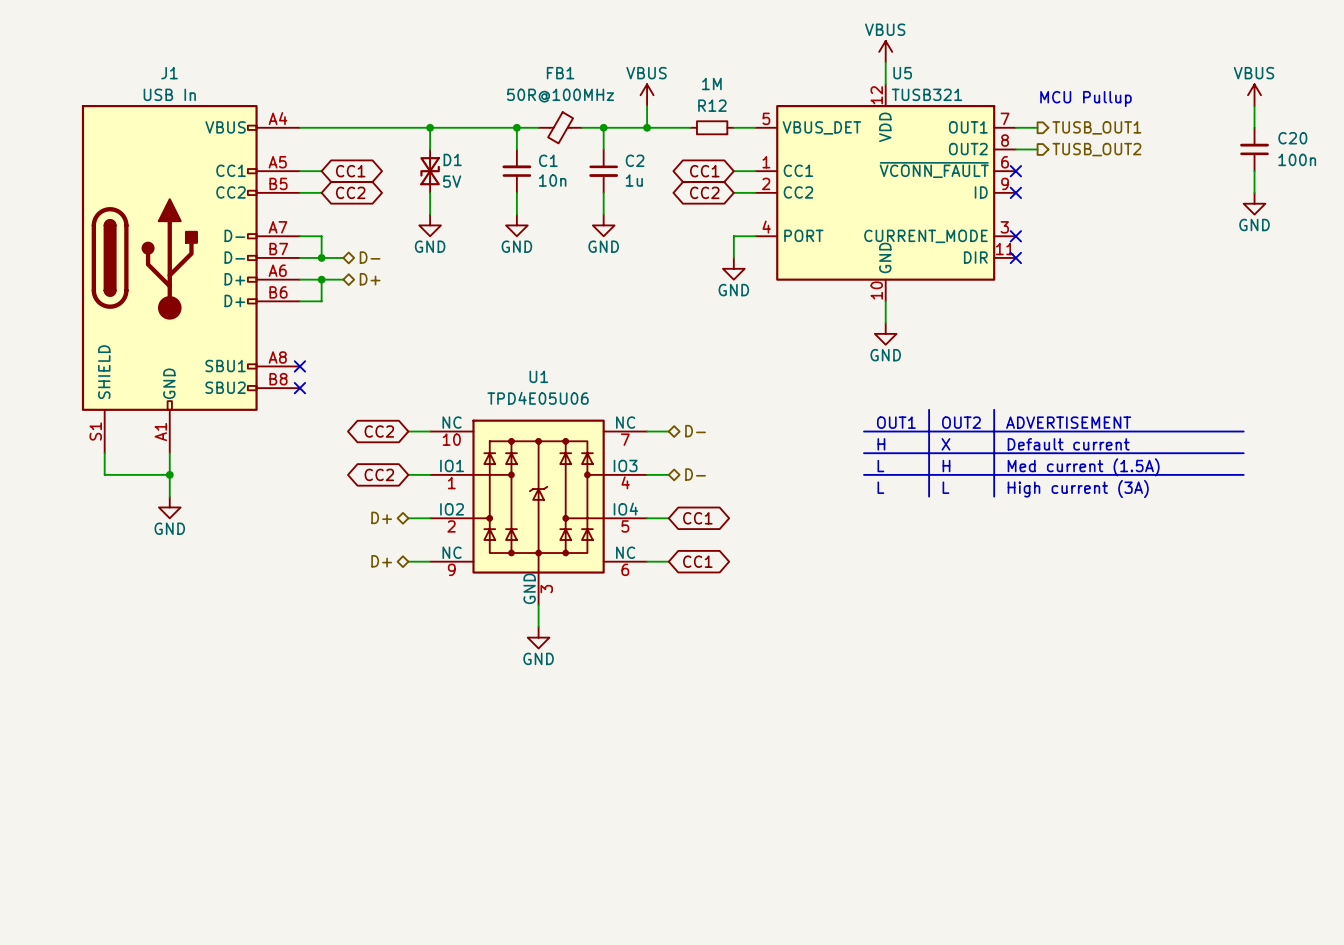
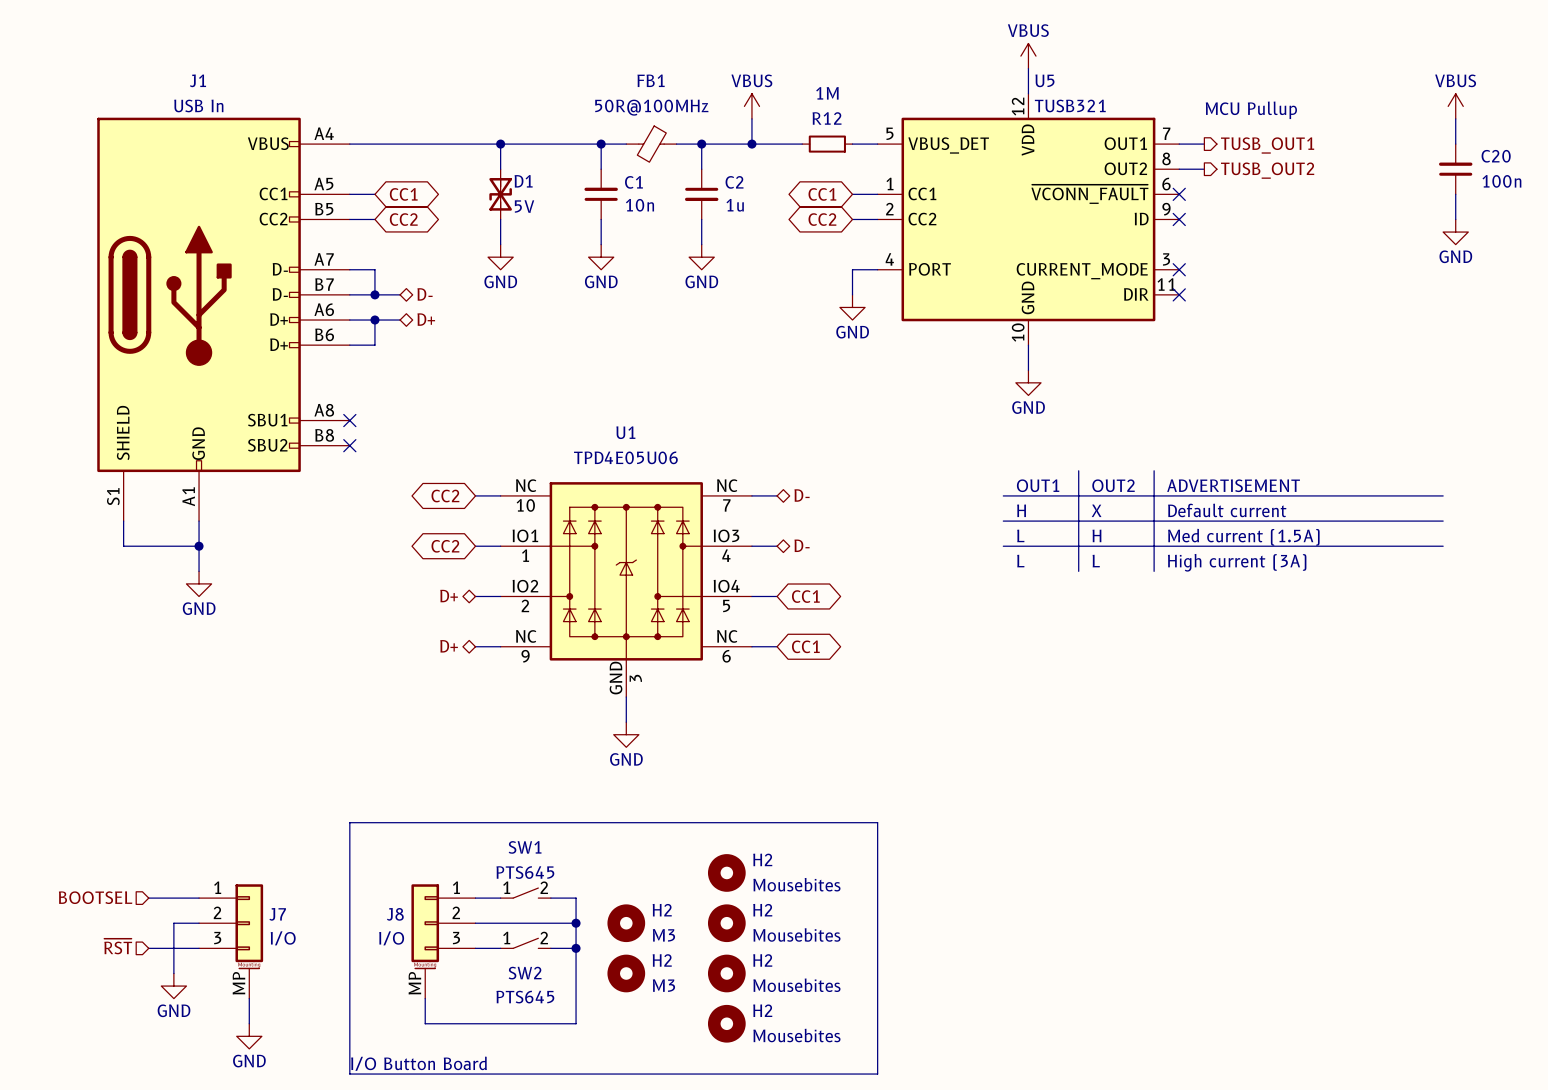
line: none -> (349, 822) (877, 822) (877, 1074) (349, 1074) (349, 822)
H2: none -> Mousebites (726, 872)
SW1: none -> PTS645 (525, 893)
hierarchical label: none -> BOOTSEL (95, 897)
wire: none -> (148, 898) (199, 898)
wire: none -> (475, 898) (500, 898)
wire: none -> (550, 898) (576, 898) (576, 1023) (425, 1023) (425, 998)
wire: none -> (199, 923) (173, 923) (173, 973)
wire: none -> (475, 923) (576, 923)
junction: none -> (576, 923)
H2: none -> M3 (626, 923)
H2: none -> Mousebites (726, 923)
J7: none -> I/O (231, 941)
J8: none -> I/O (443, 941)
SW2: none -> PTS645 (525, 943)
hierarchical label: none -> ~{RST} (118, 946)
wire: none -> (148, 948) (199, 948)
wire: none -> (475, 948) (500, 948)
wire: none -> (550, 948) (576, 948)
junction: none -> (576, 948)
H2: none -> M3 (626, 973)
H2: none -> Mousebites (726, 973)
power symbol: none -> GND (173, 986)
wire: none -> (249, 998) (249, 1023)
H2: none -> Mousebites (726, 1023)
power symbol: none -> GND (249, 1036)
text: none -> I/O Button Board (418, 1063)

